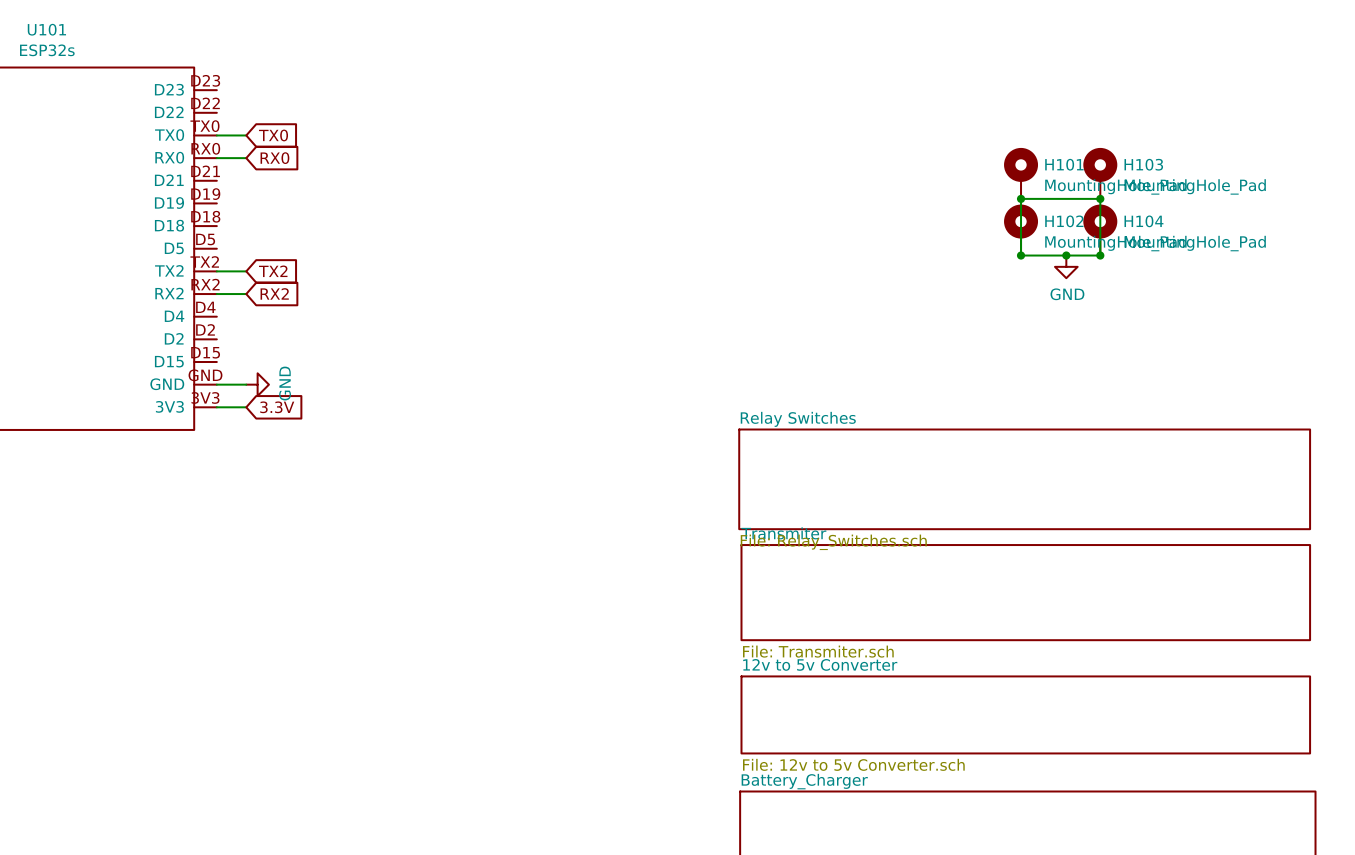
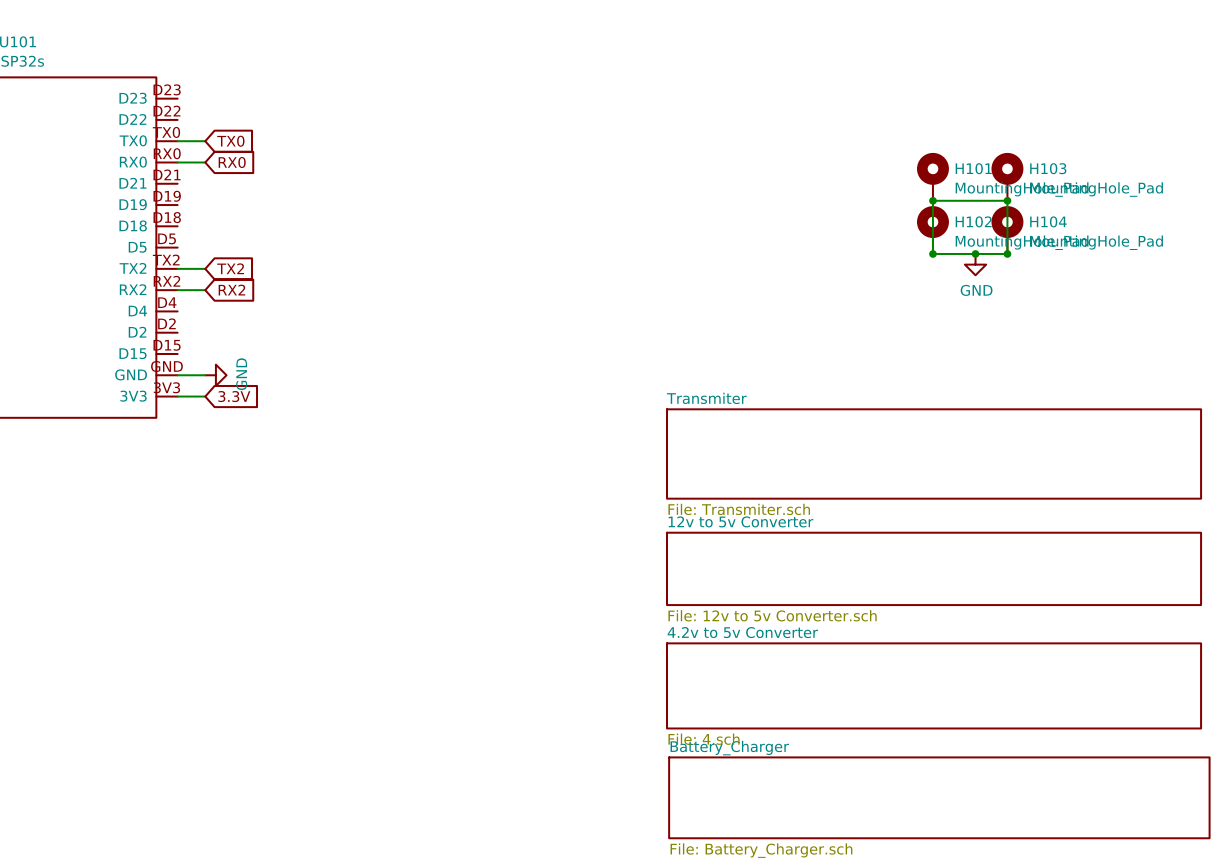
sheet Relay Switches: File: Relay_Switches.sch (1024, 479) -> none
sheet Transmiter position: (1025, 592) -> (934, 453)
sheet 12v to 5v Converter position: (1025, 714) -> (934, 568)
sheet 4.2v to 5v Converter: none -> File: 4.sch (934, 685)

